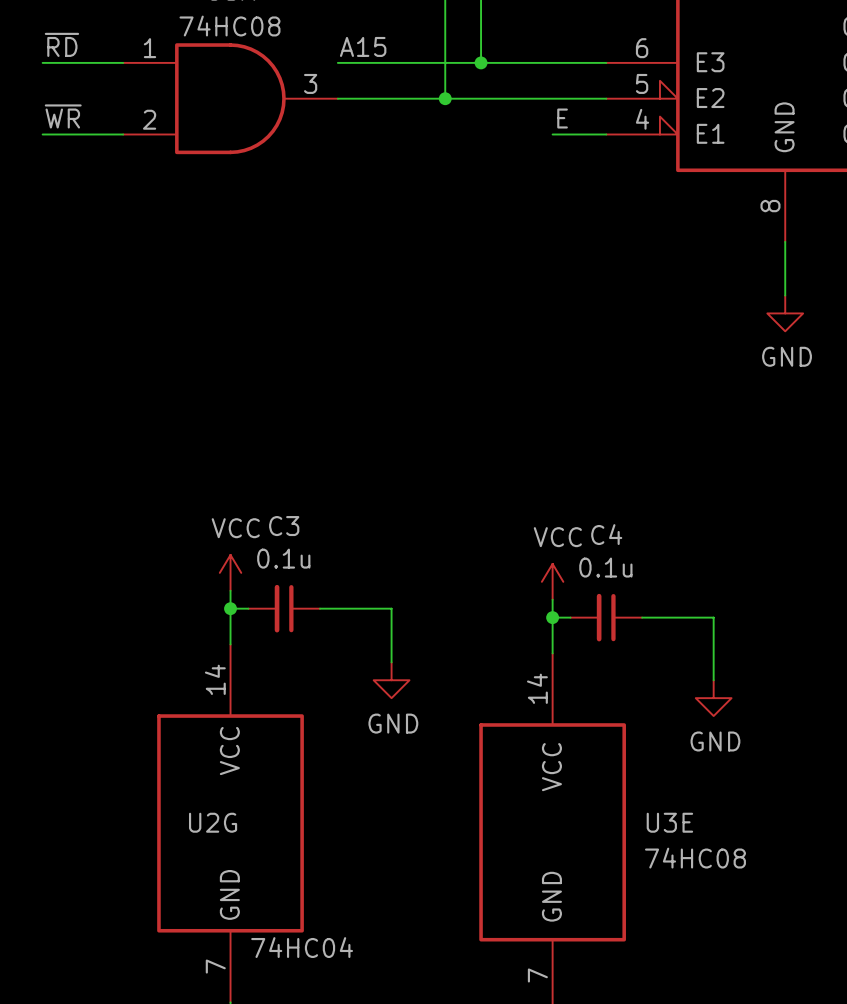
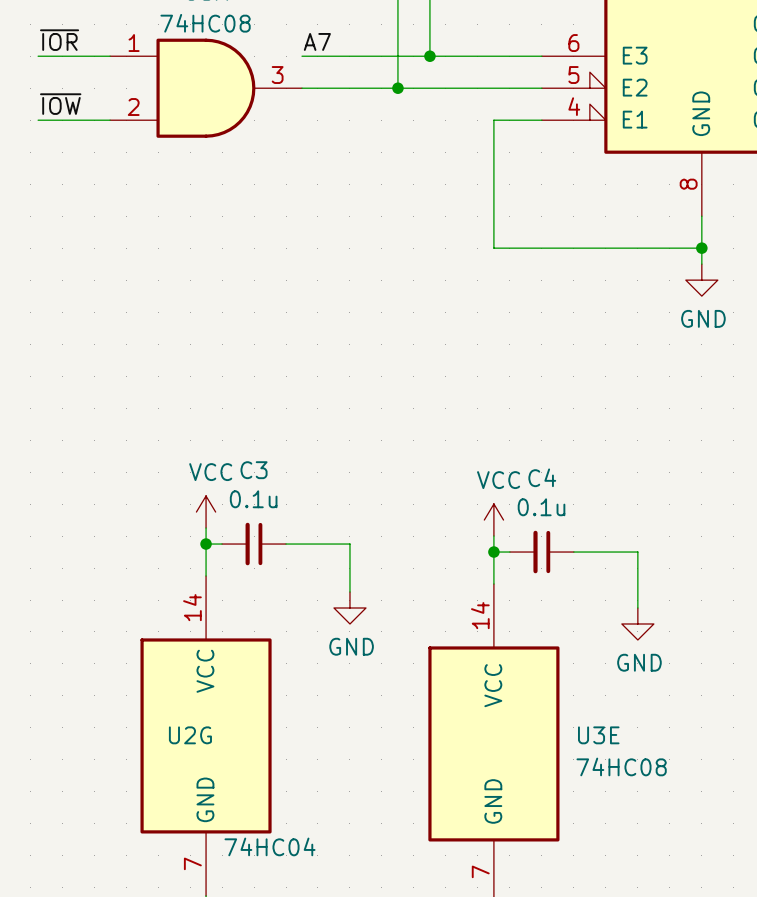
label: ~{RD} (61, 44) -> ~{IOR} (59, 40)
label: A15 (363, 46) -> A7 (317, 41)
label: ~{WR} (63, 116) -> ~{IOW} (60, 104)
label: E (562, 118) -> none
wire: none -> (493, 120) (493, 248) (701, 248)
junction: none -> (701, 248)

